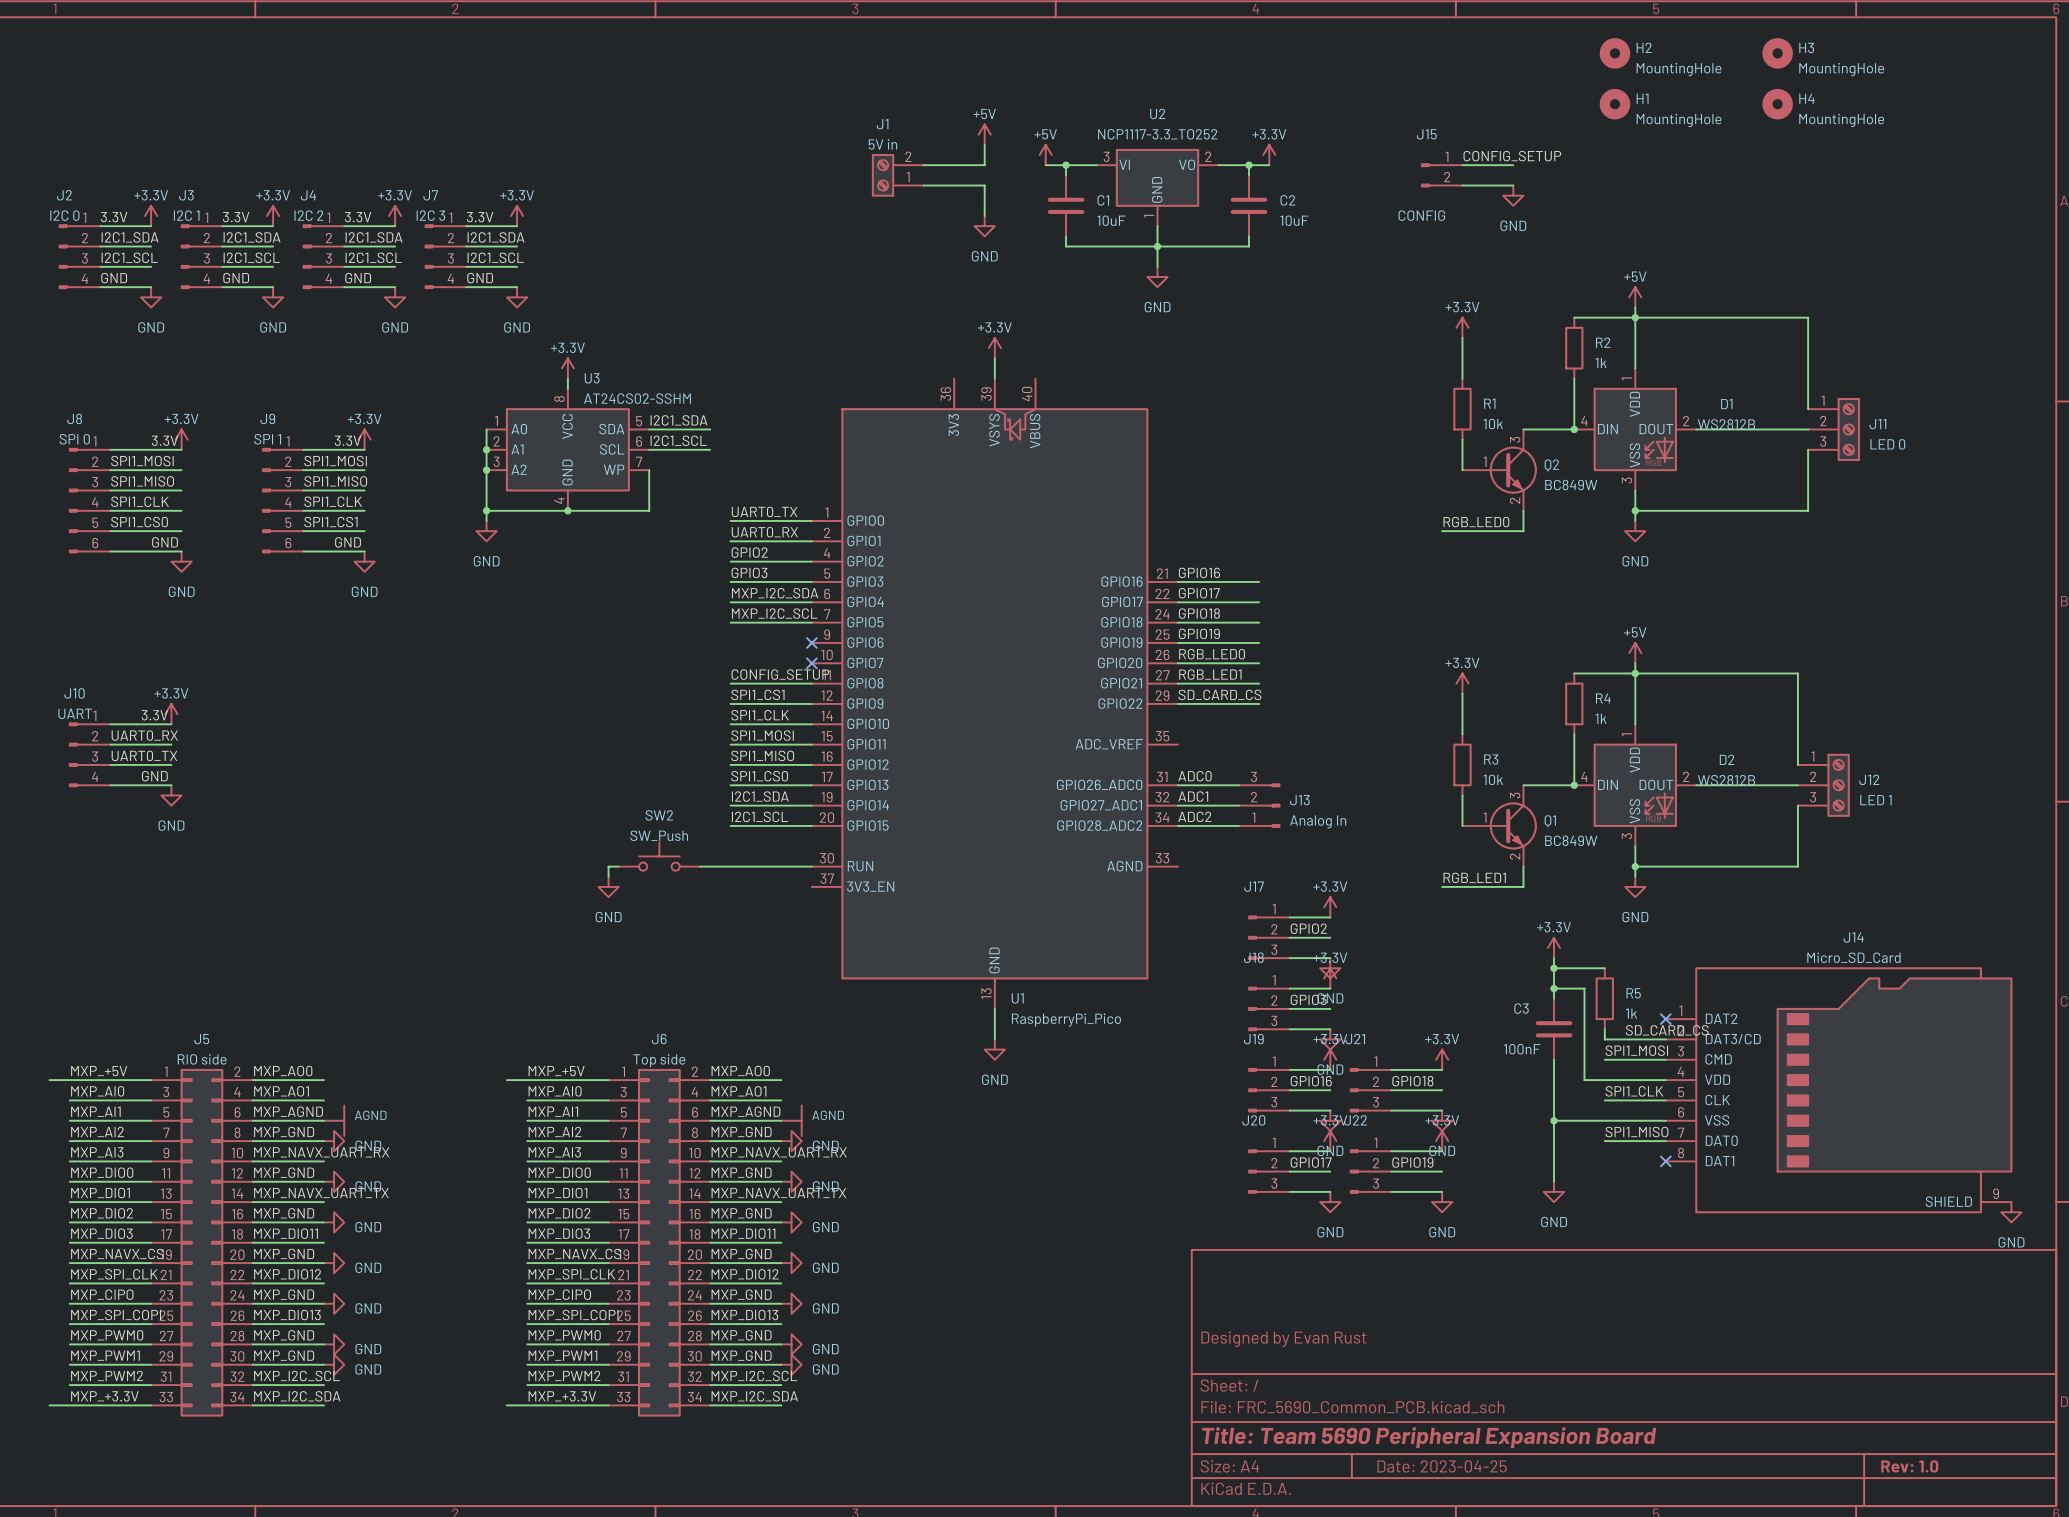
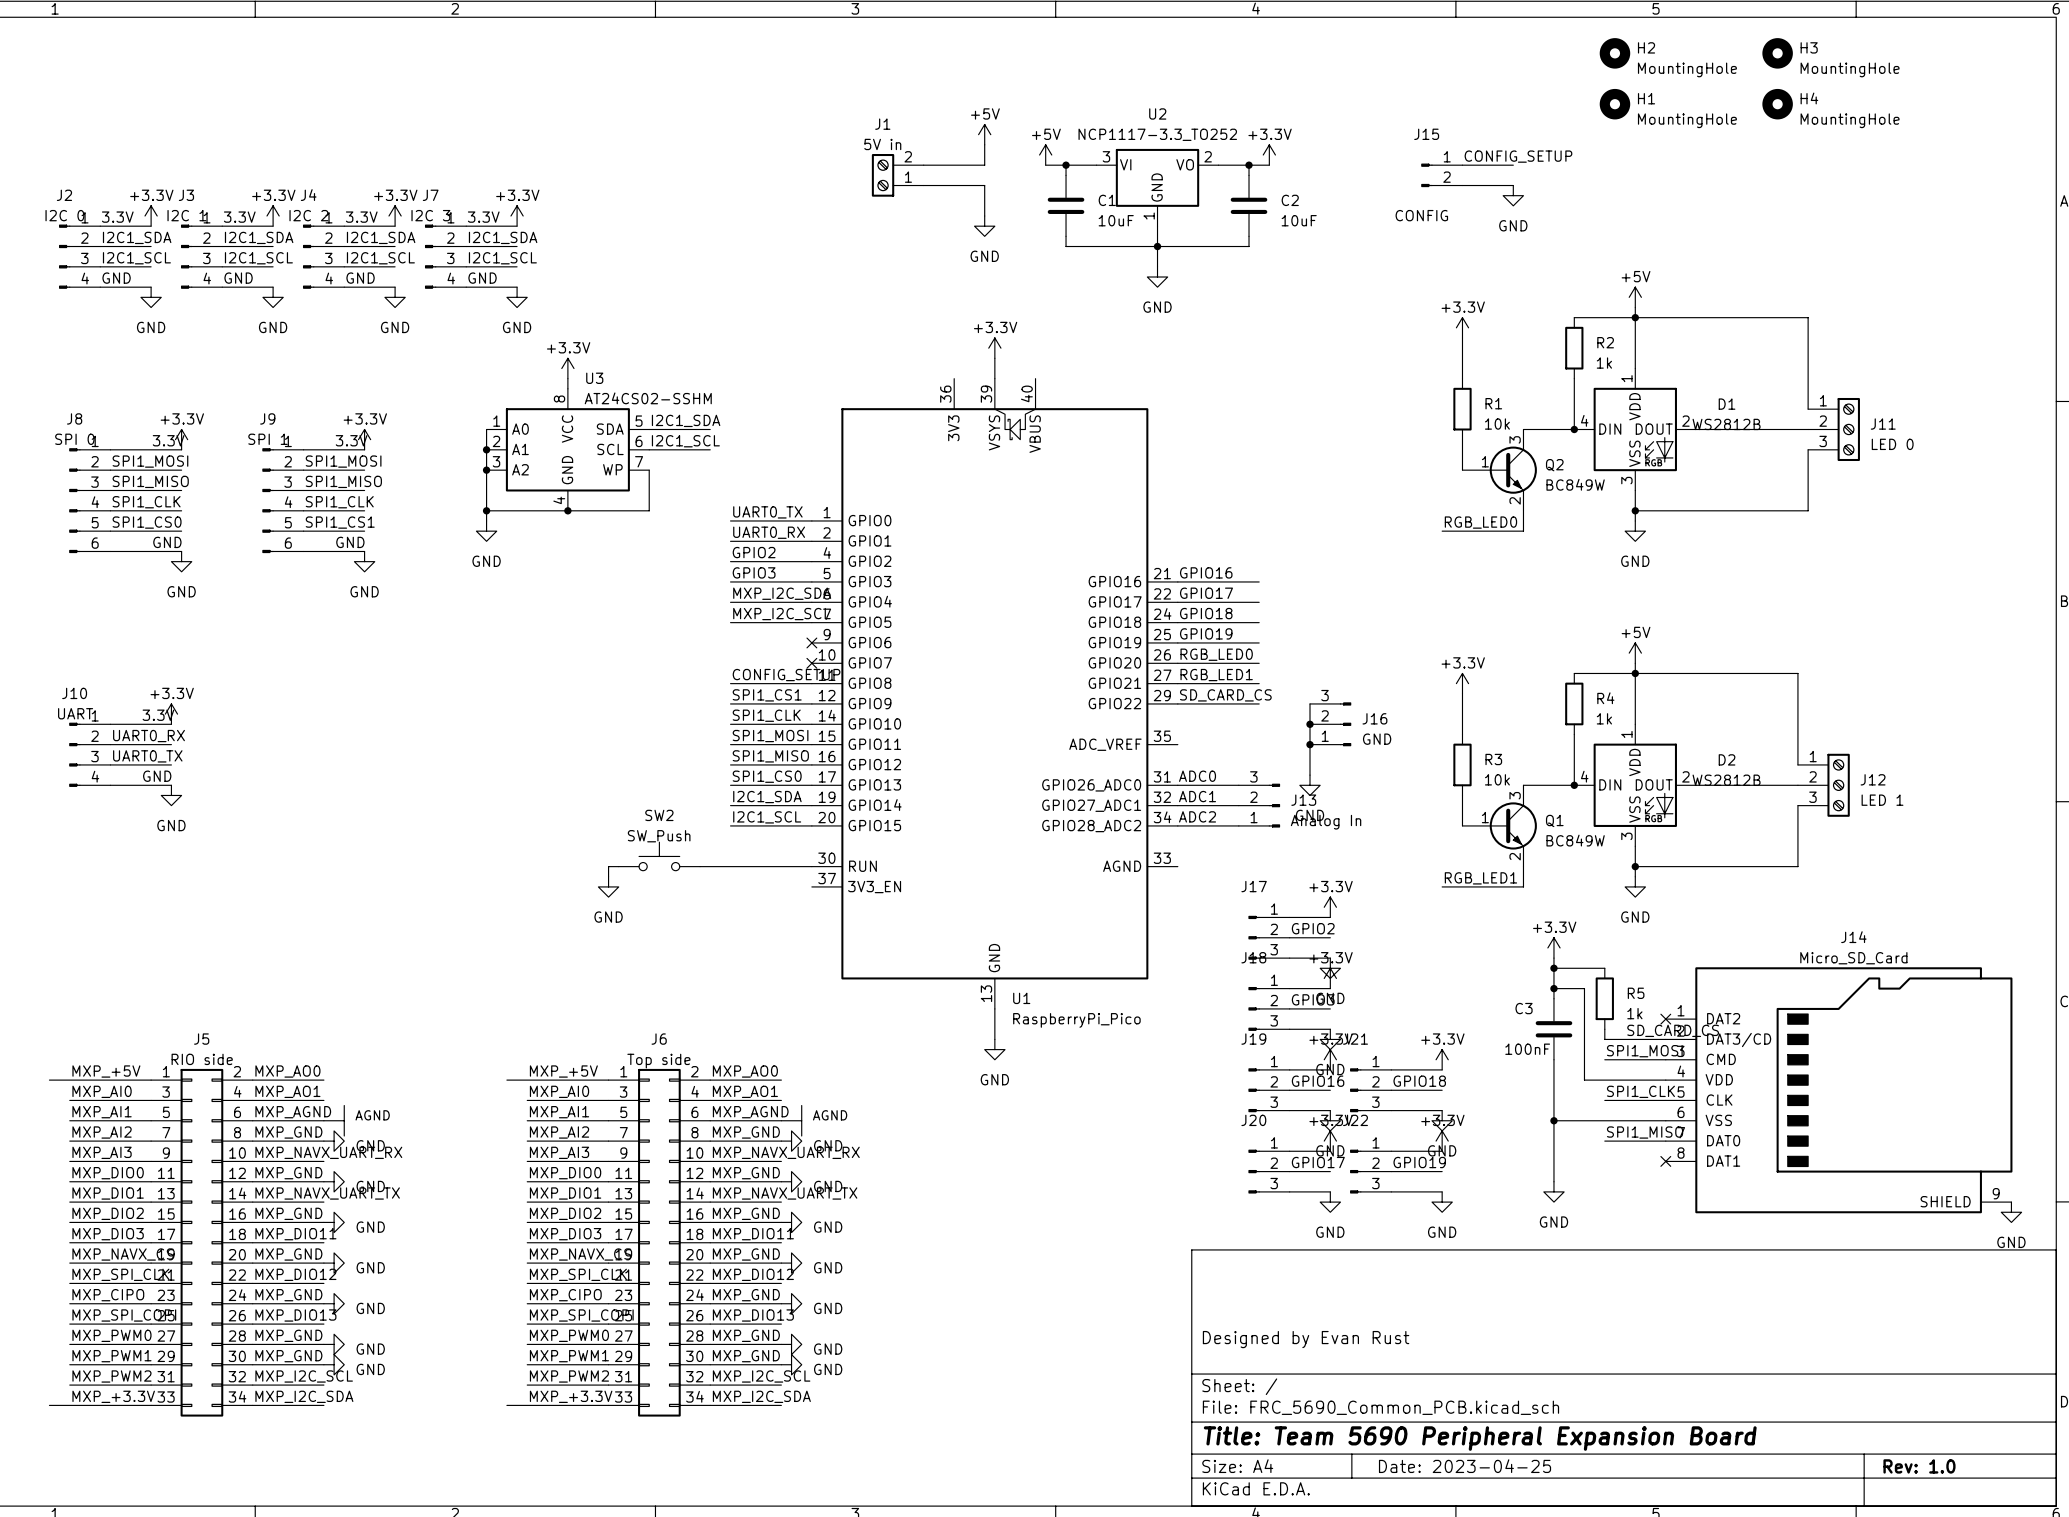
wire: none -> (1310, 703) (1310, 775)
junction: none -> (1310, 724)
J16: none -> GND (1330, 724)
junction: none -> (1310, 744)
power symbol: none -> GND (1310, 785)

